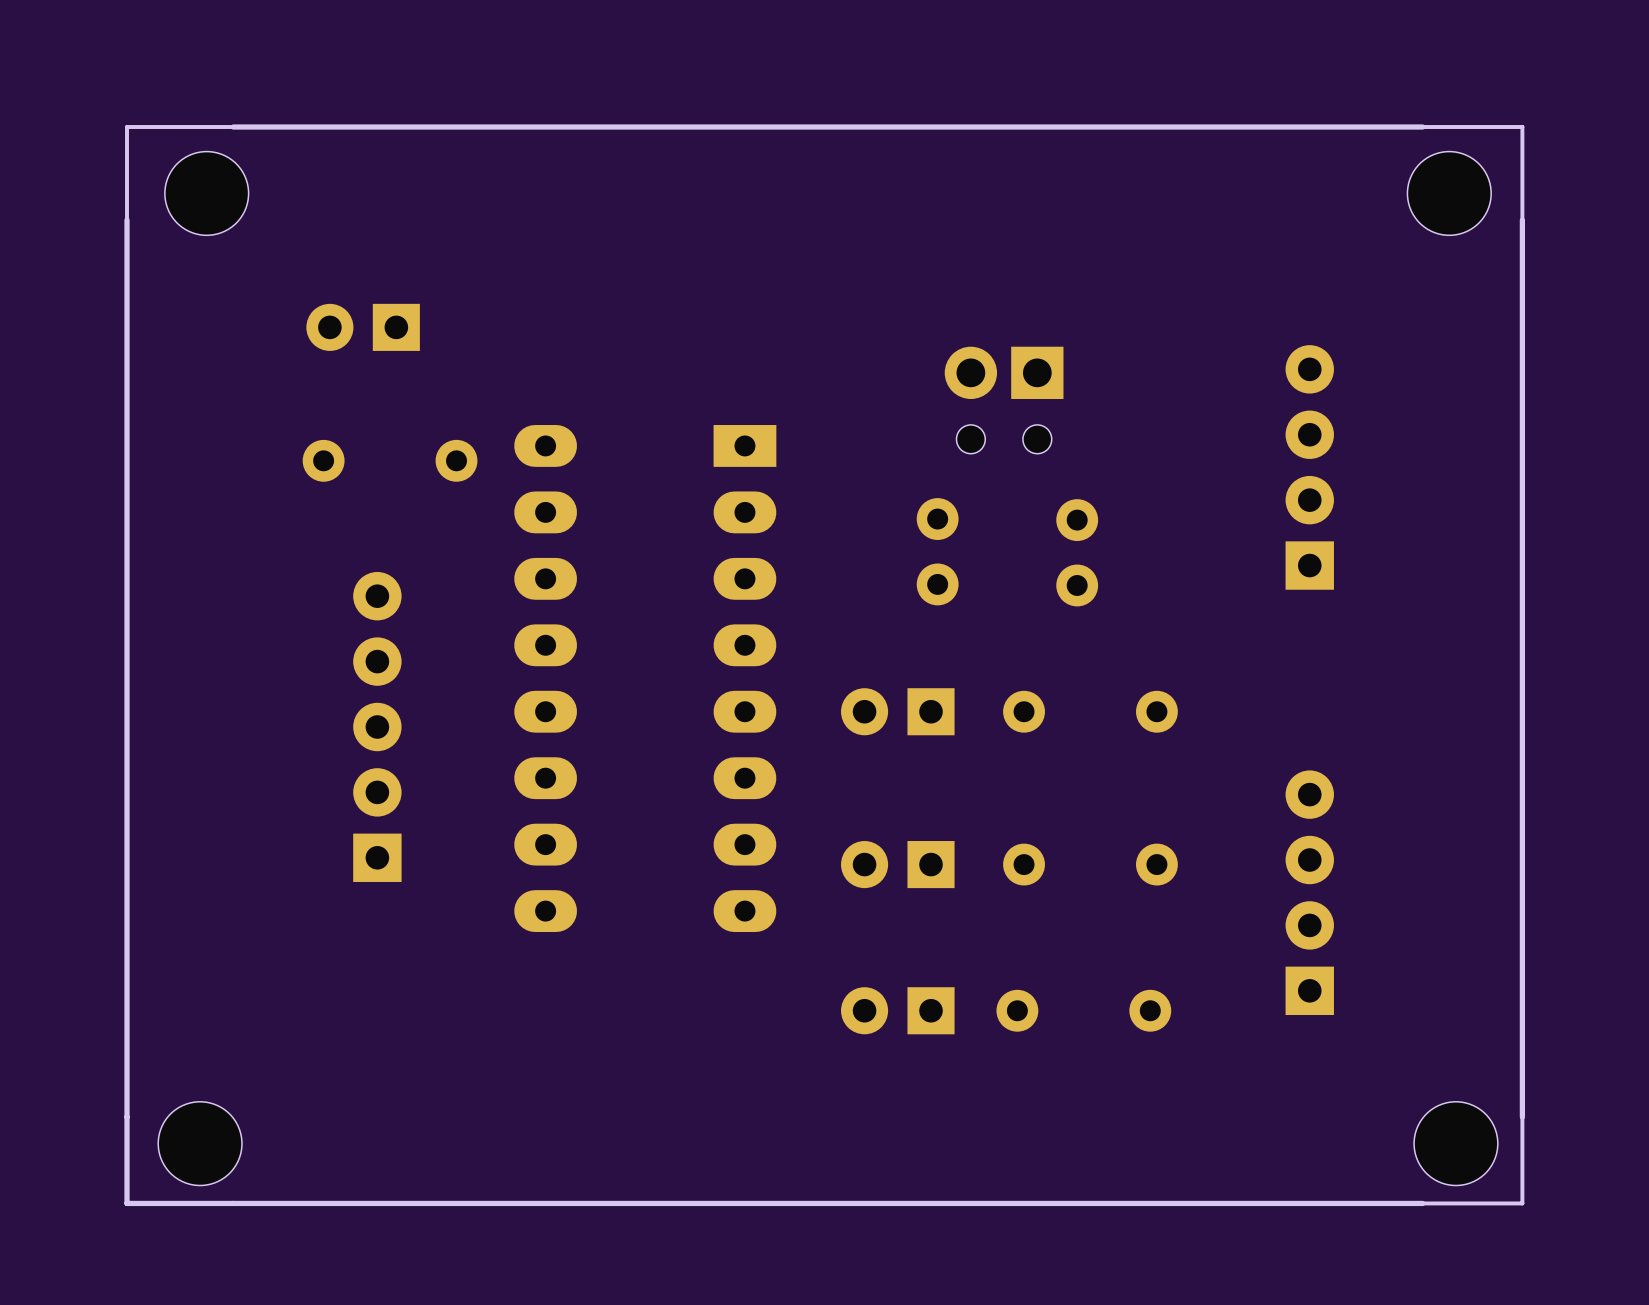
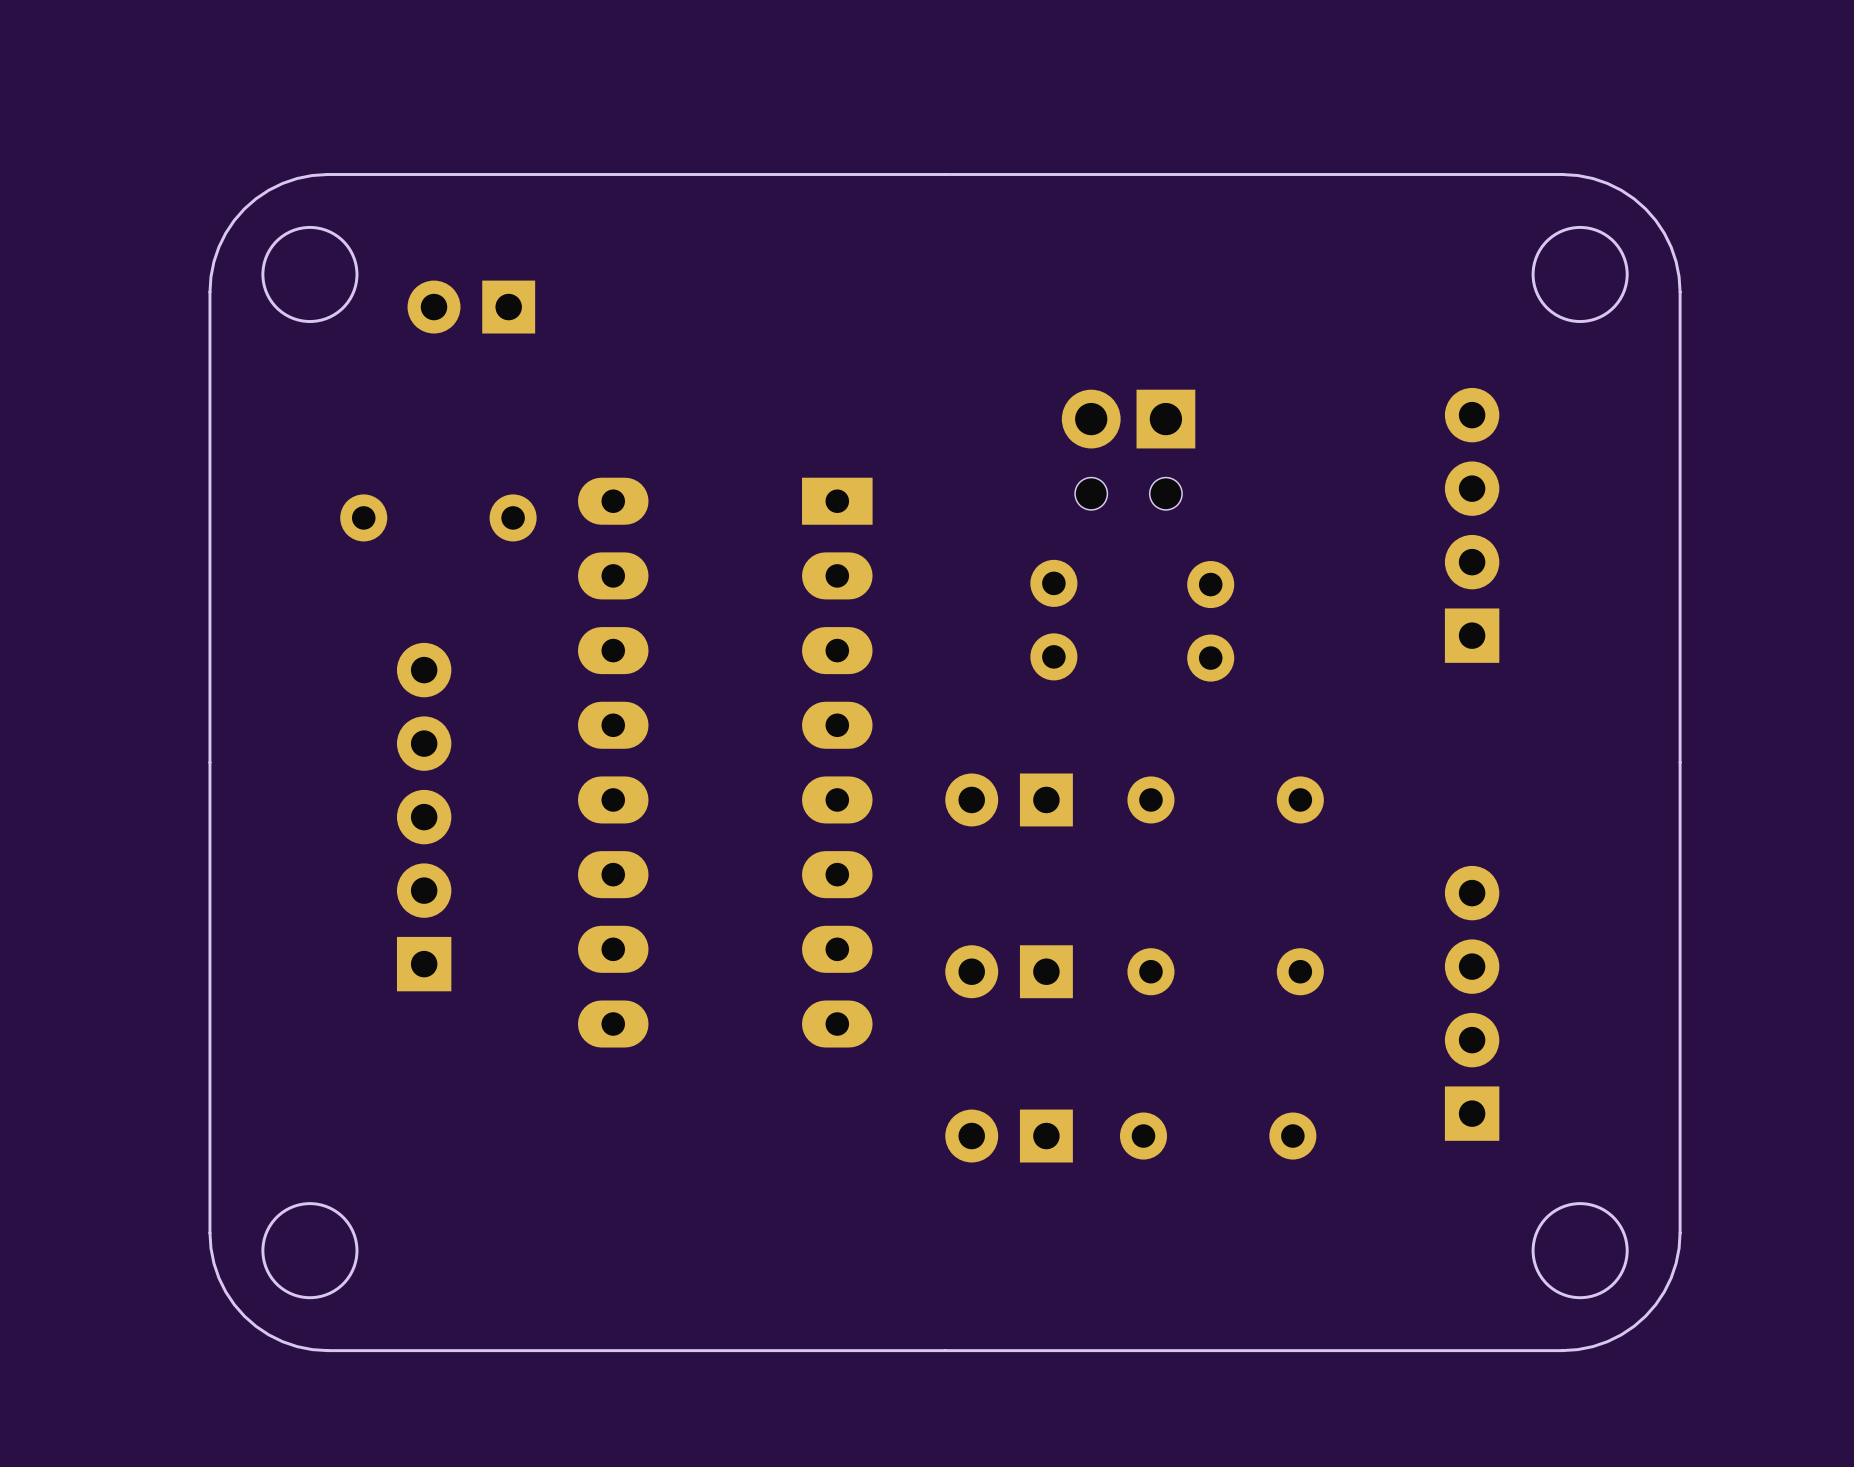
board edge: (1522, 127) (127, 127) (127, 1203) (1522, 1203) (1522, 127) -> (1562, 174) (1592, 178) (1607, 183) (1634, 198) (1645, 208) (1655, 220) (1671, 247) (1676, 261) (1680, 292) (1680, 1233) (1676, 1263) (1671, 1278) (1655, 1304) (1634, 1326) (1607, 1341) (1592, 1346) (1562, 1350) (327, 1350) (297, 1346) (282, 1341) (255, 1326) (234, 1304) (218, 1278) (213, 1263) (209, 1233) (209, 292) (213, 261) (225, 233) (234, 220) (255, 198) (282, 183) (297, 178) (327, 174) (1562, 174)
part: (206, 193) -> none
part: (1449, 193) -> none
round board edge: none -> [261, 225, 359, 323]
round board edge: none -> [1531, 225, 1629, 323]
part position: (363, 327) -> (471, 307)
round board edge: none -> [261, 1202, 359, 1300]
round board edge: none -> [1531, 1202, 1629, 1300]
part: (200, 1143) -> none
part: (1455, 1143) -> none

